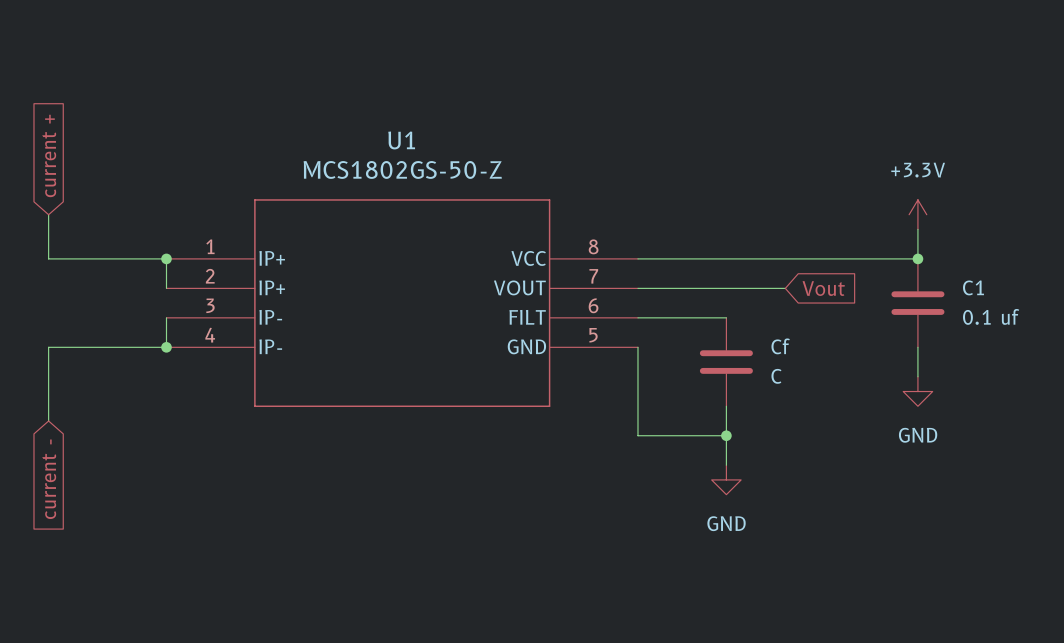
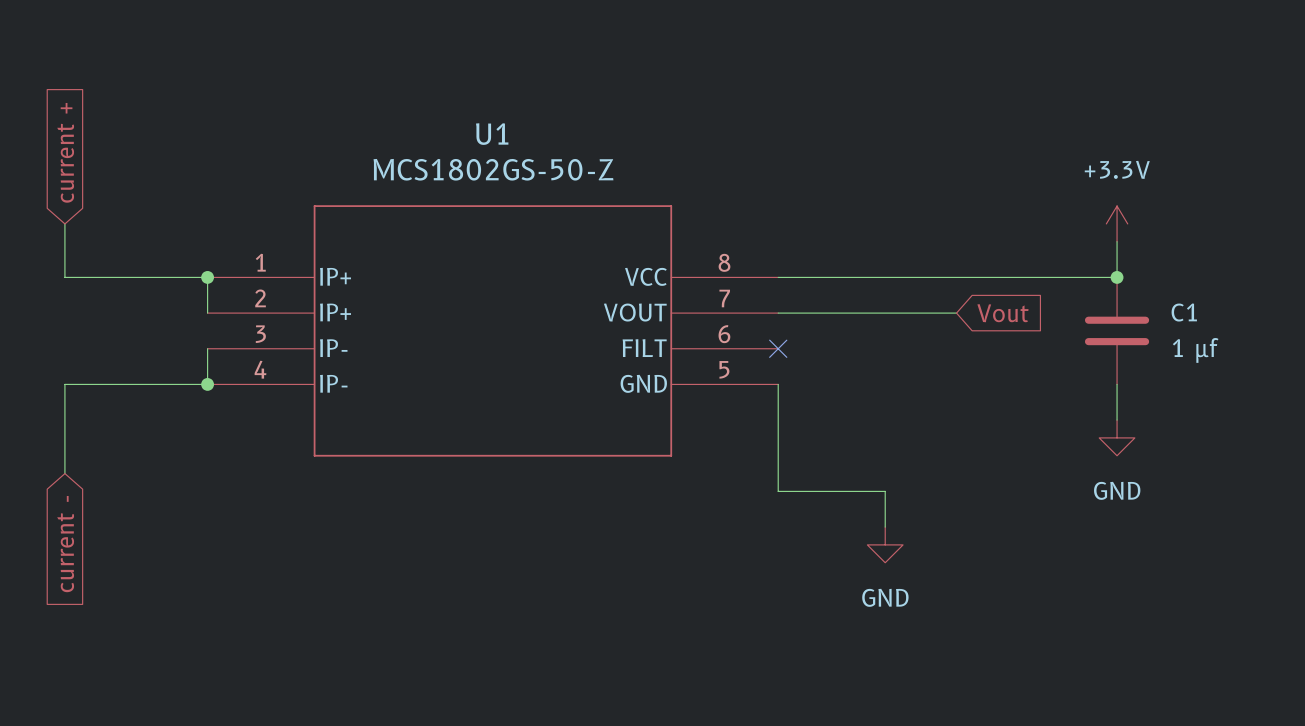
C1 value: 0.1 uf (991, 316) -> 1 µf (1195, 350)
wire: (637, 317) (726, 317) -> none
no-connect mark: none -> (778, 348)
Cf: C (726, 362) -> none
wire: (726, 406) (726, 435) -> none
junction: (726, 435) -> none

